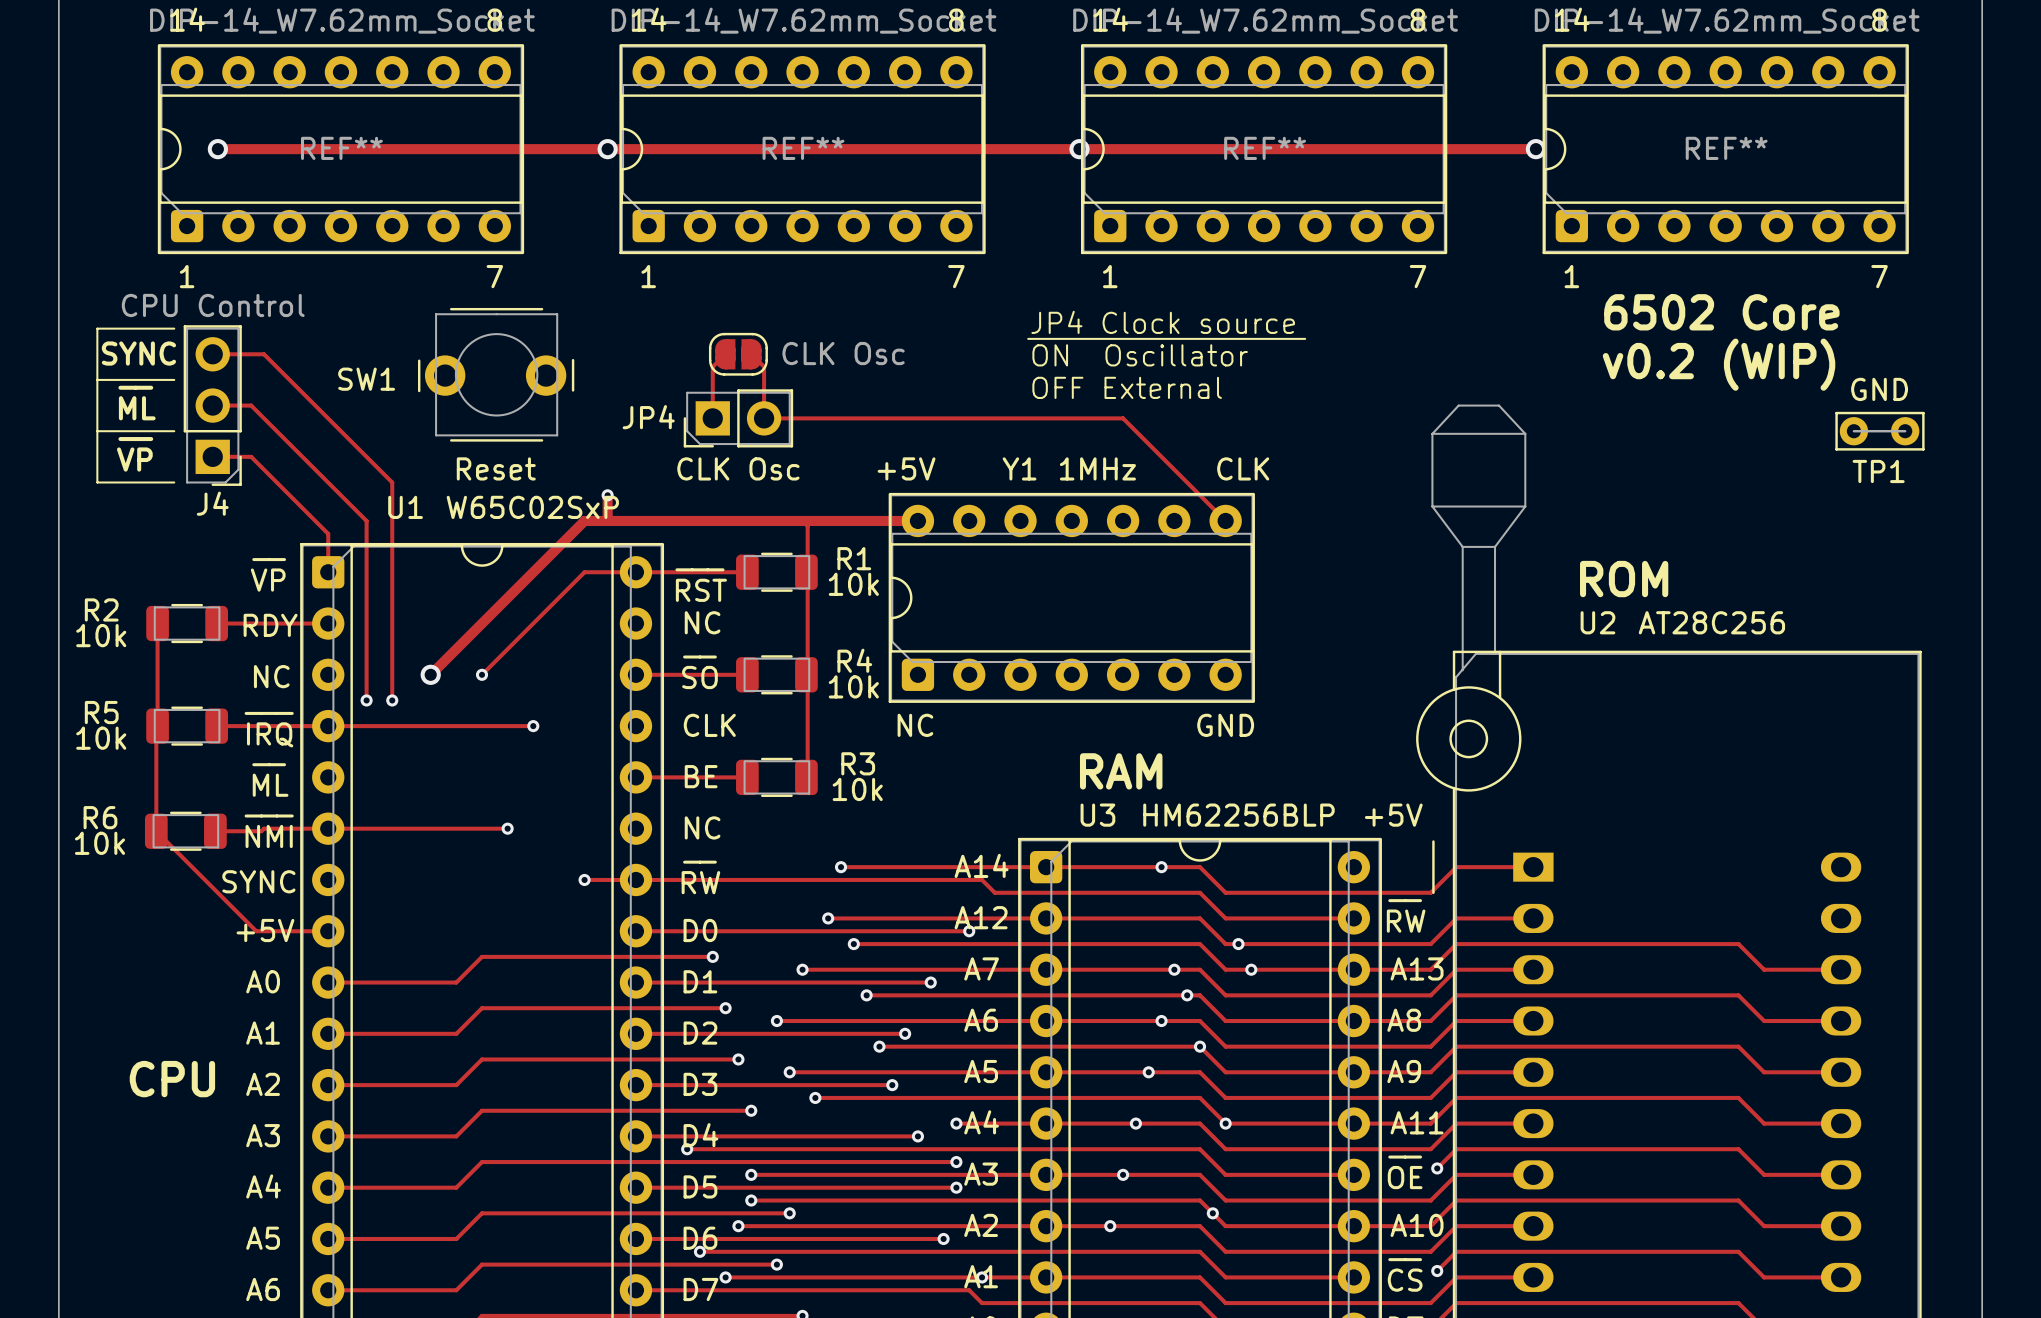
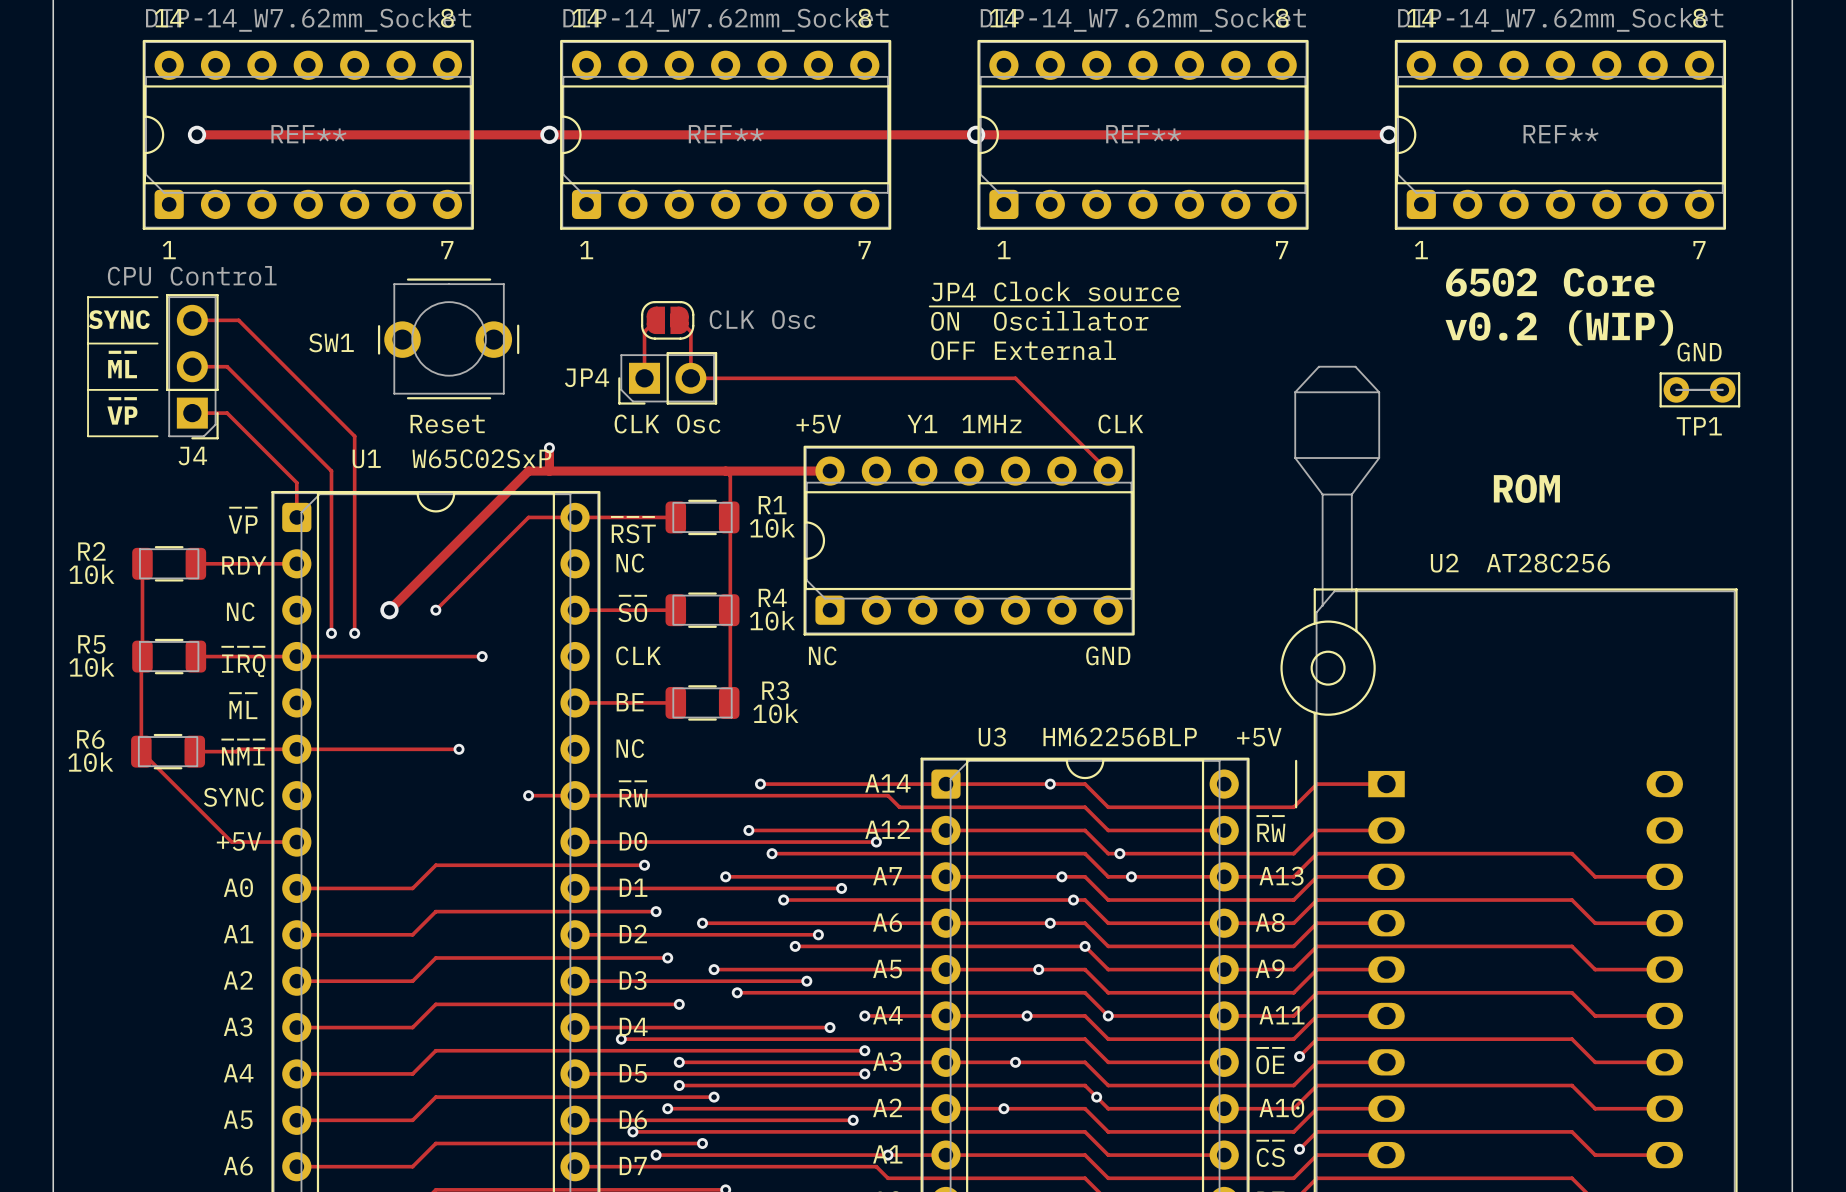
text position: ROM (1624, 579) -> ROM (1526, 488)
text: RAM (1121, 771) -> none
text: CPU (172, 1079) -> none

